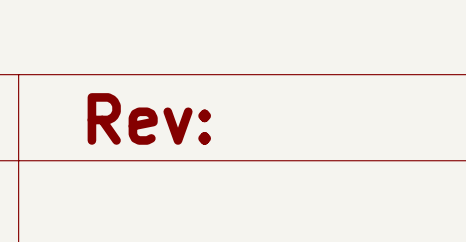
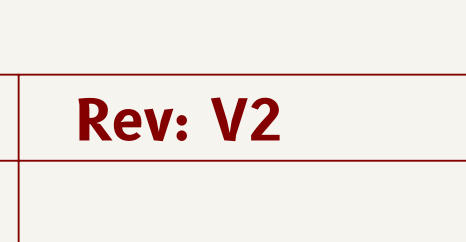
title block: Rev: (149, 118) -> Rev: V2 (178, 119)

